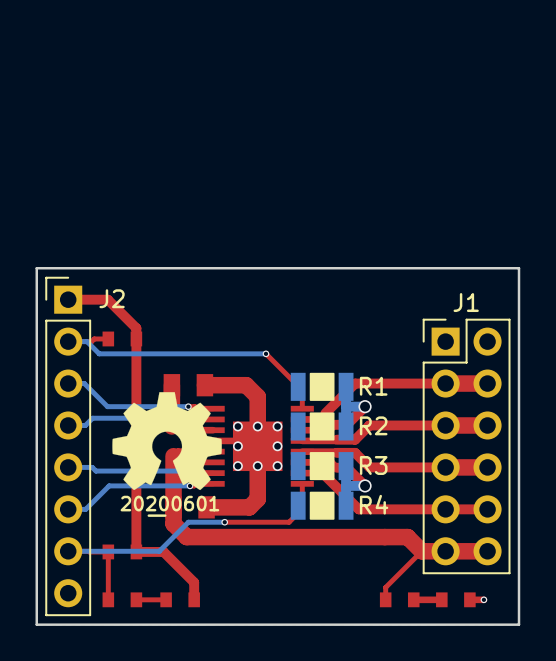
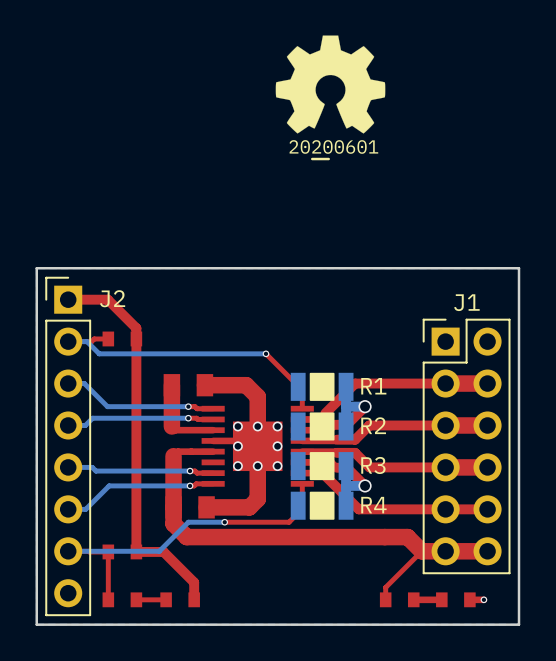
drawing position: (167, 441) -> (330, 84)
drawing position: (157, 515) -> (320, 159)

